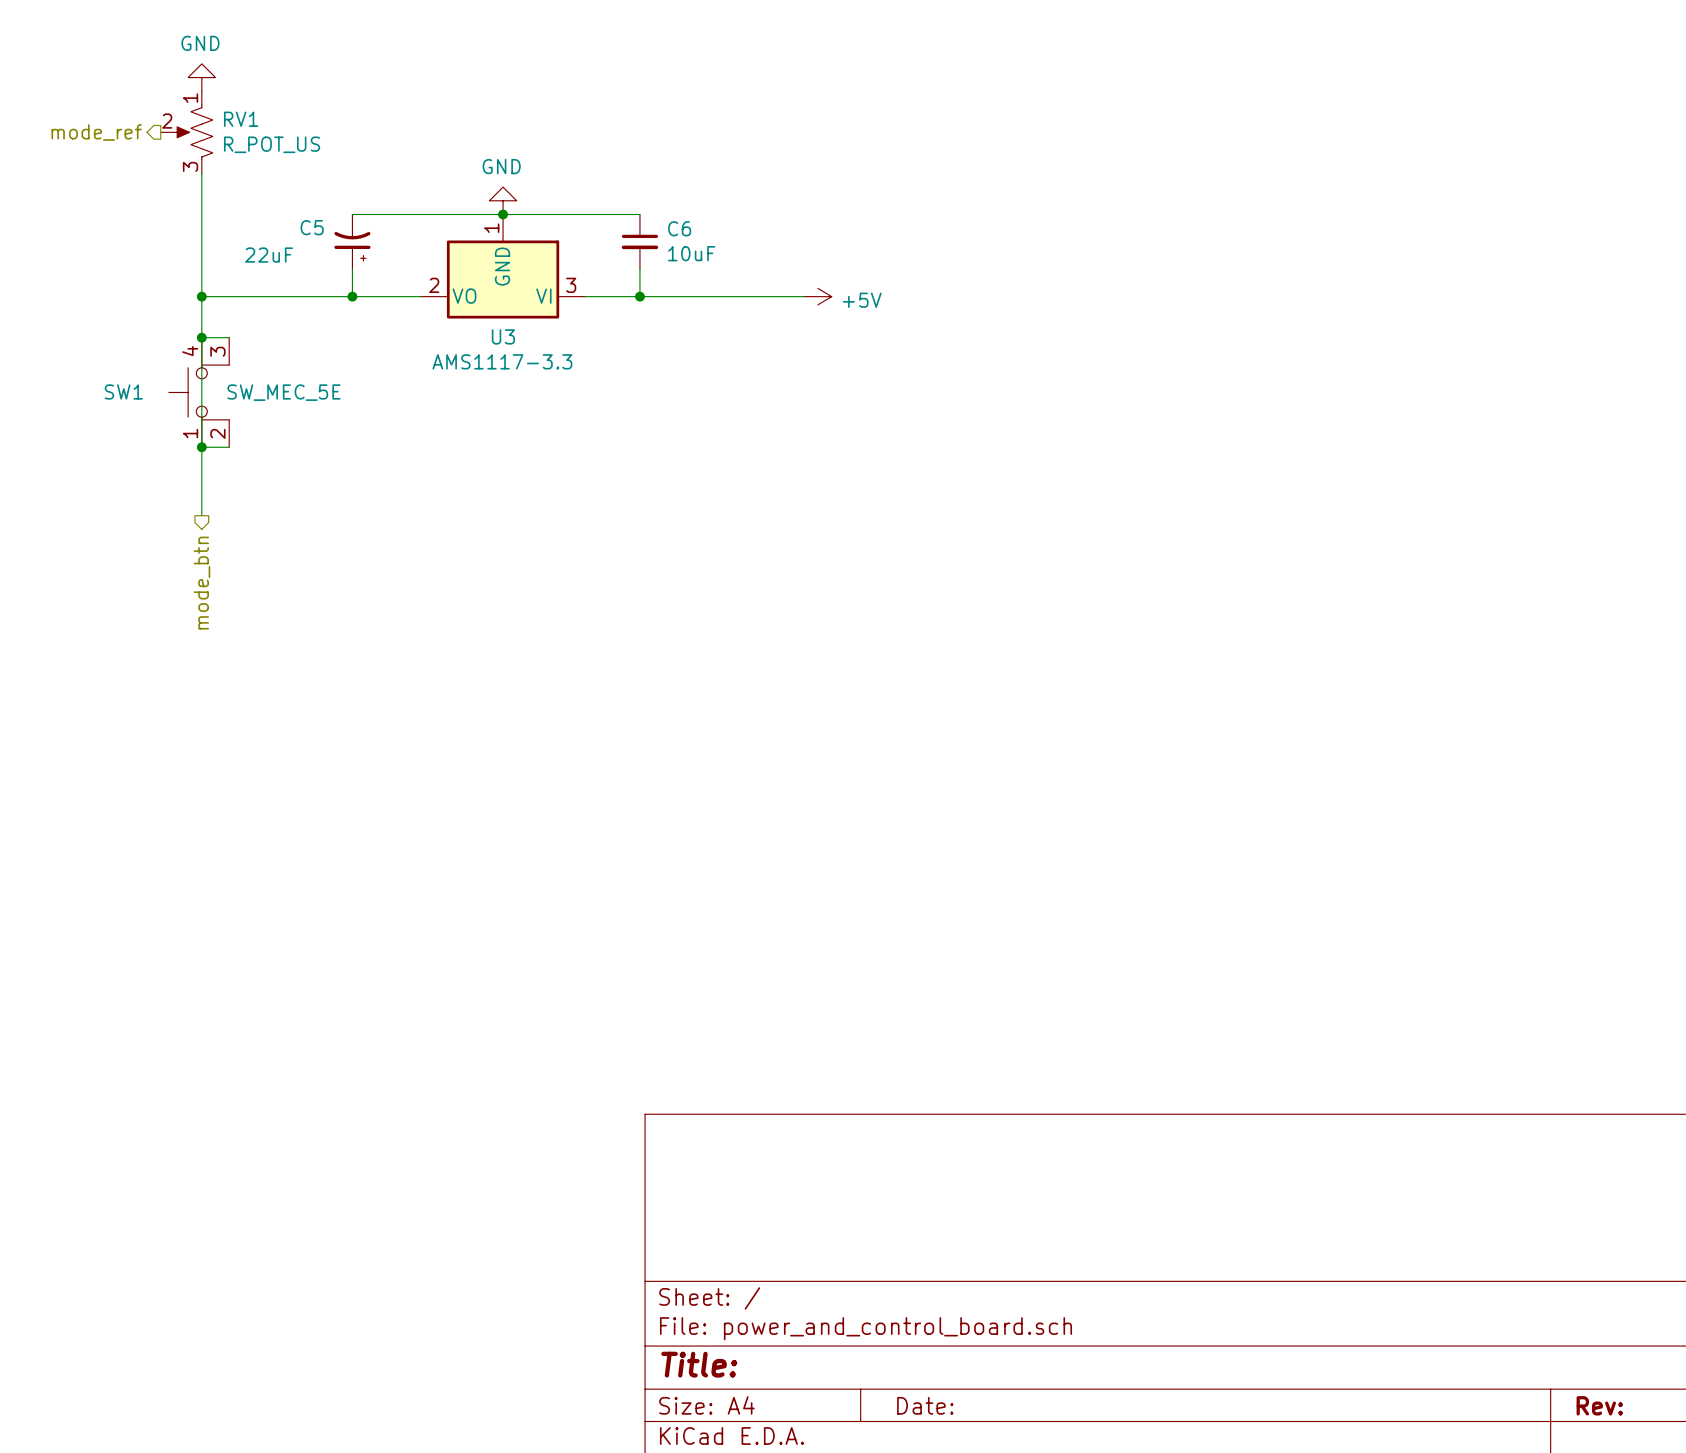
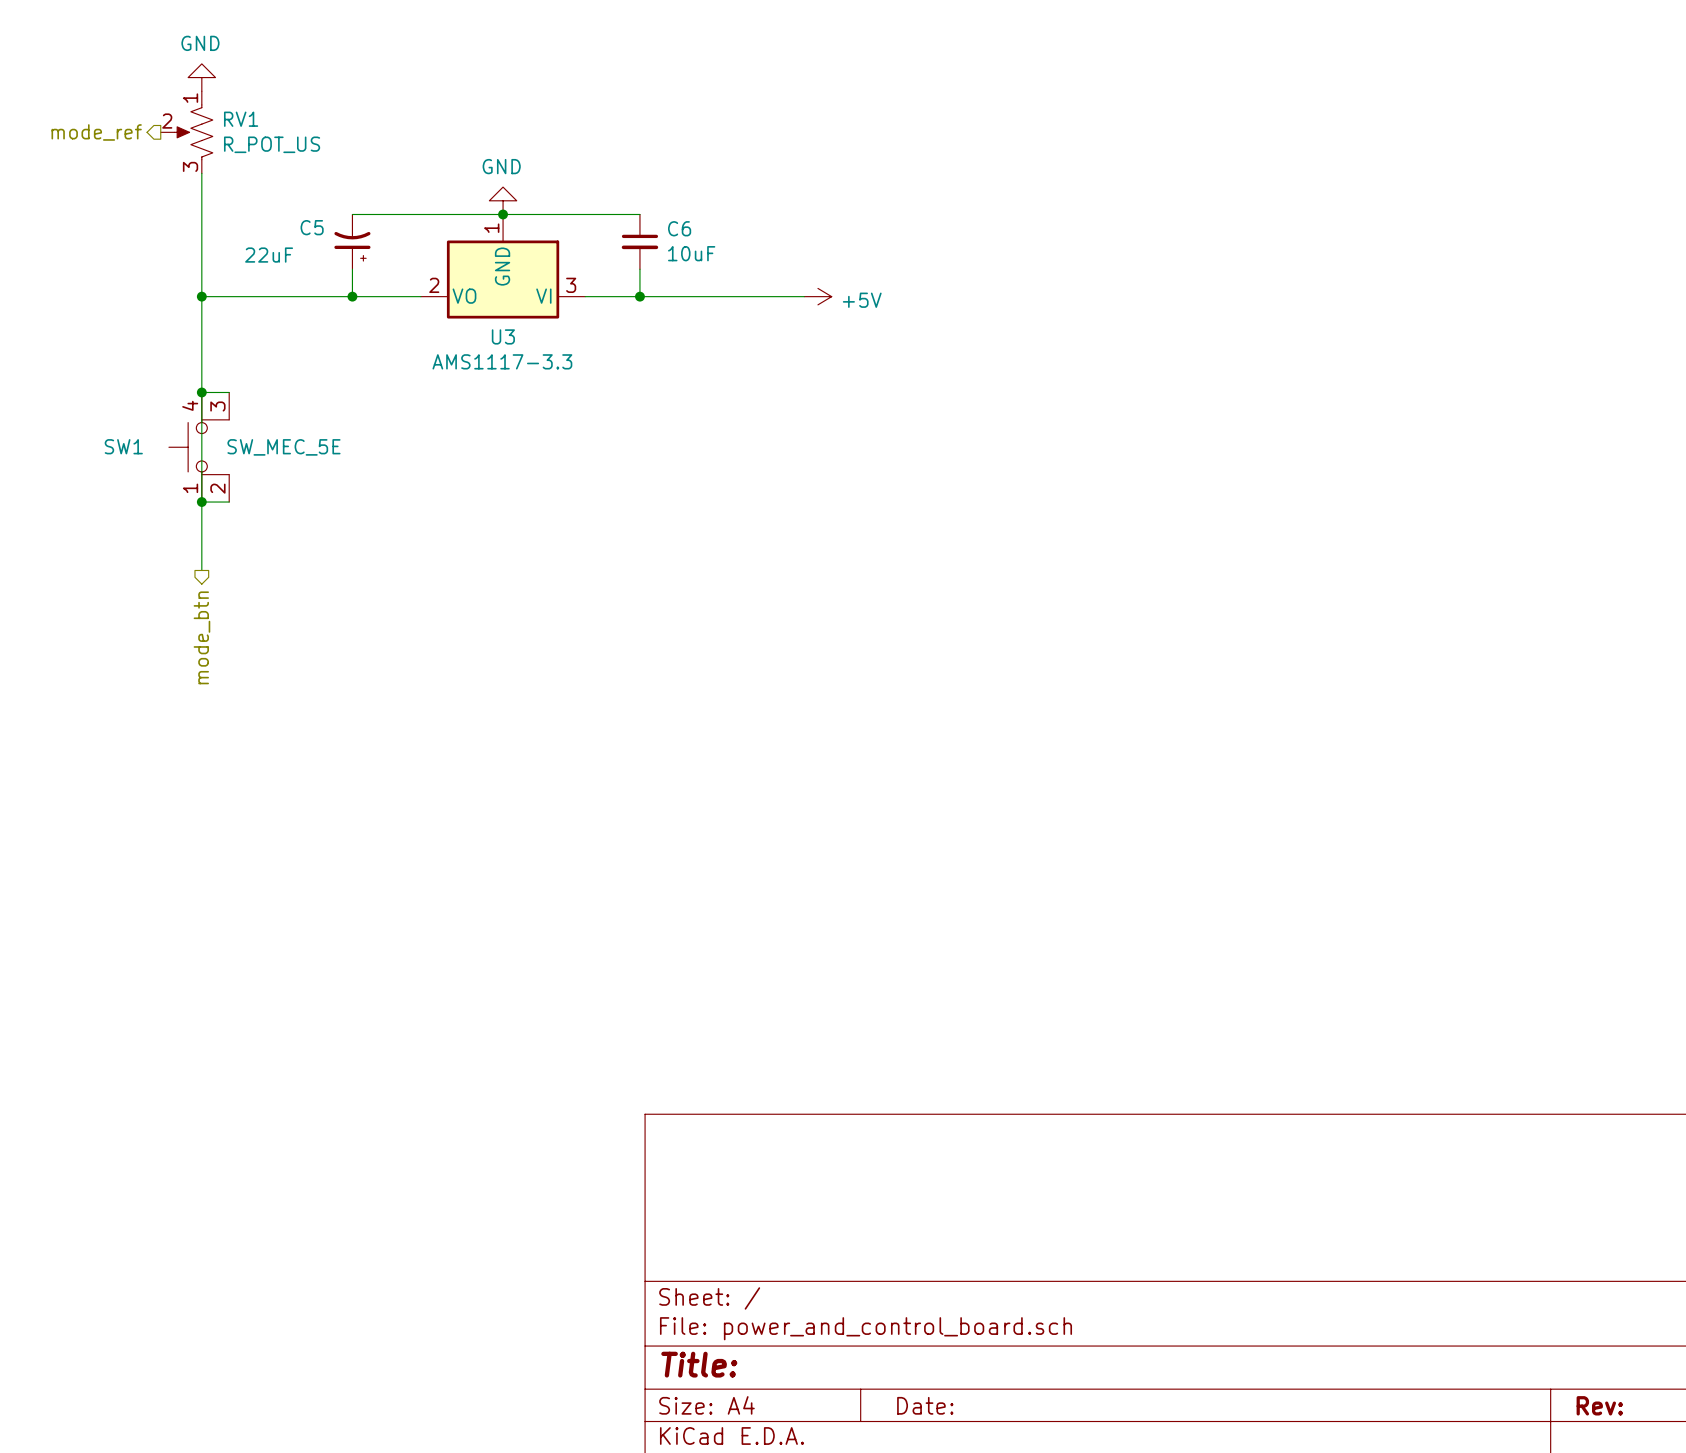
wire: (201, 337) (229, 337) -> (201, 392) (229, 392)
junction: (201, 337) -> none
SW1 position: (199, 392) -> (199, 447)
junction: none -> (201, 392)
wire: (201, 447) (229, 447) -> (201, 502) (229, 502)
junction: (201, 447) -> none
junction: none -> (201, 502)
wire: none -> (201, 515) (201, 570)
hierarchical label position: mode_btn (201, 583) -> mode_btn (201, 637)

